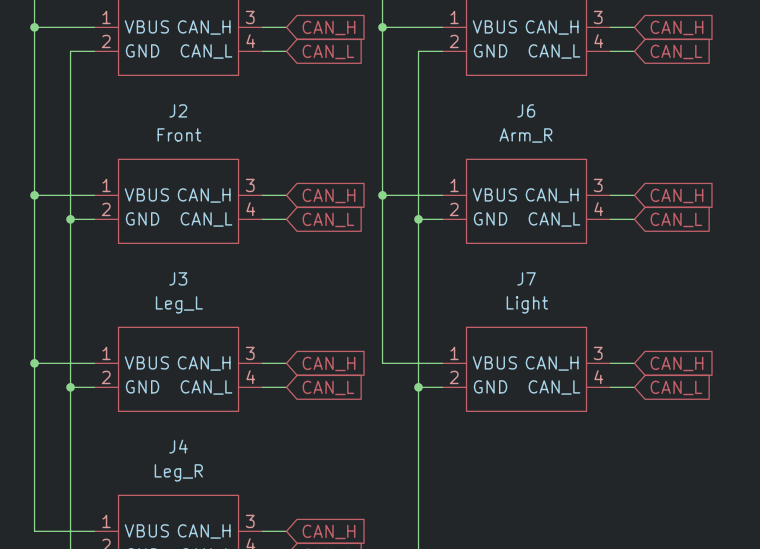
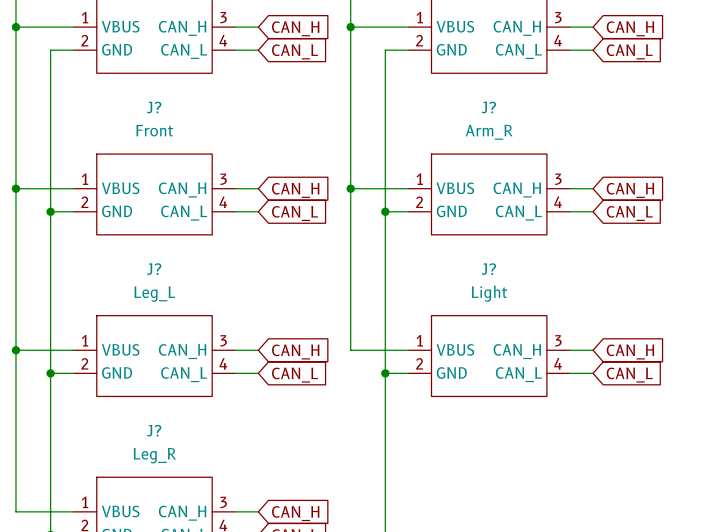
J2 name: J2 (178, 110) -> J? (154, 107)
J6 name: J6 (526, 110) -> J? (488, 107)
J3 name: J3 (178, 278) -> J? (154, 269)
J7 name: J7 (526, 278) -> J? (488, 269)
J4 name: J4 (178, 446) -> J? (154, 430)

